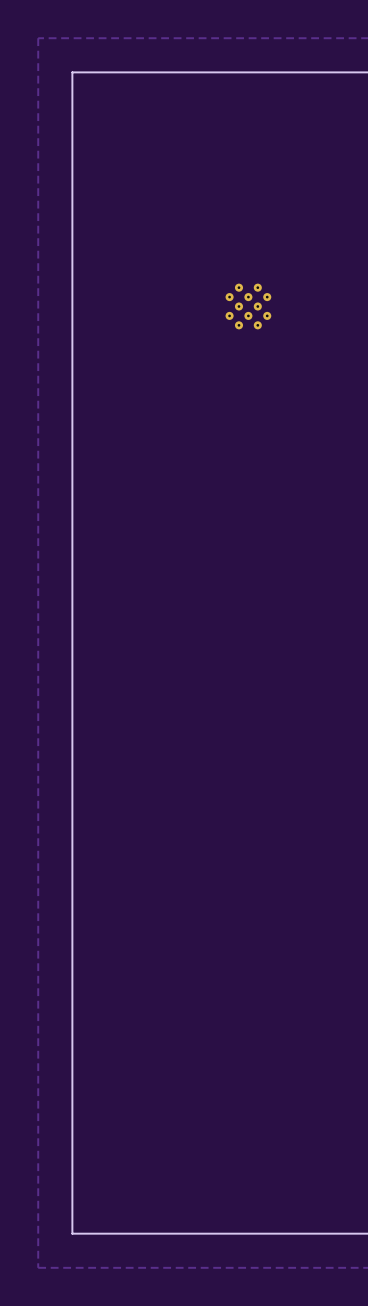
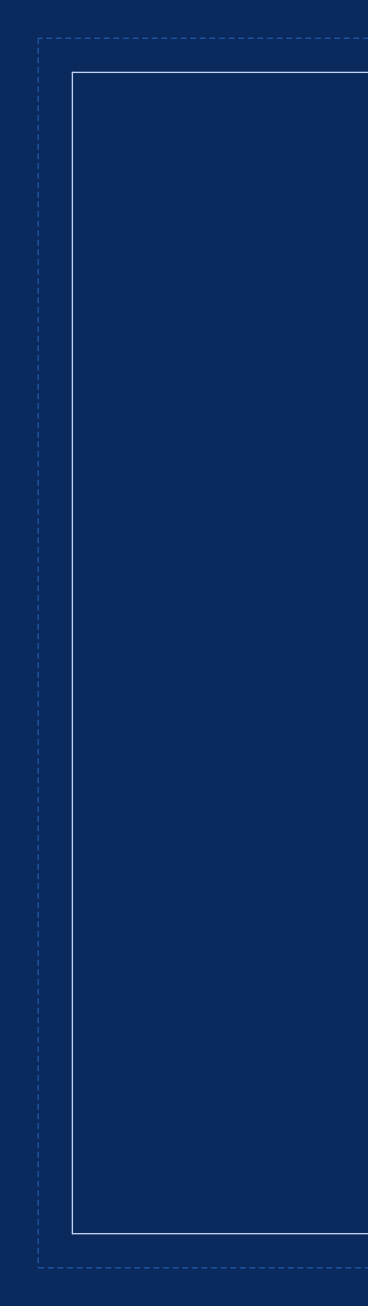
part: (248, 306) -> none

